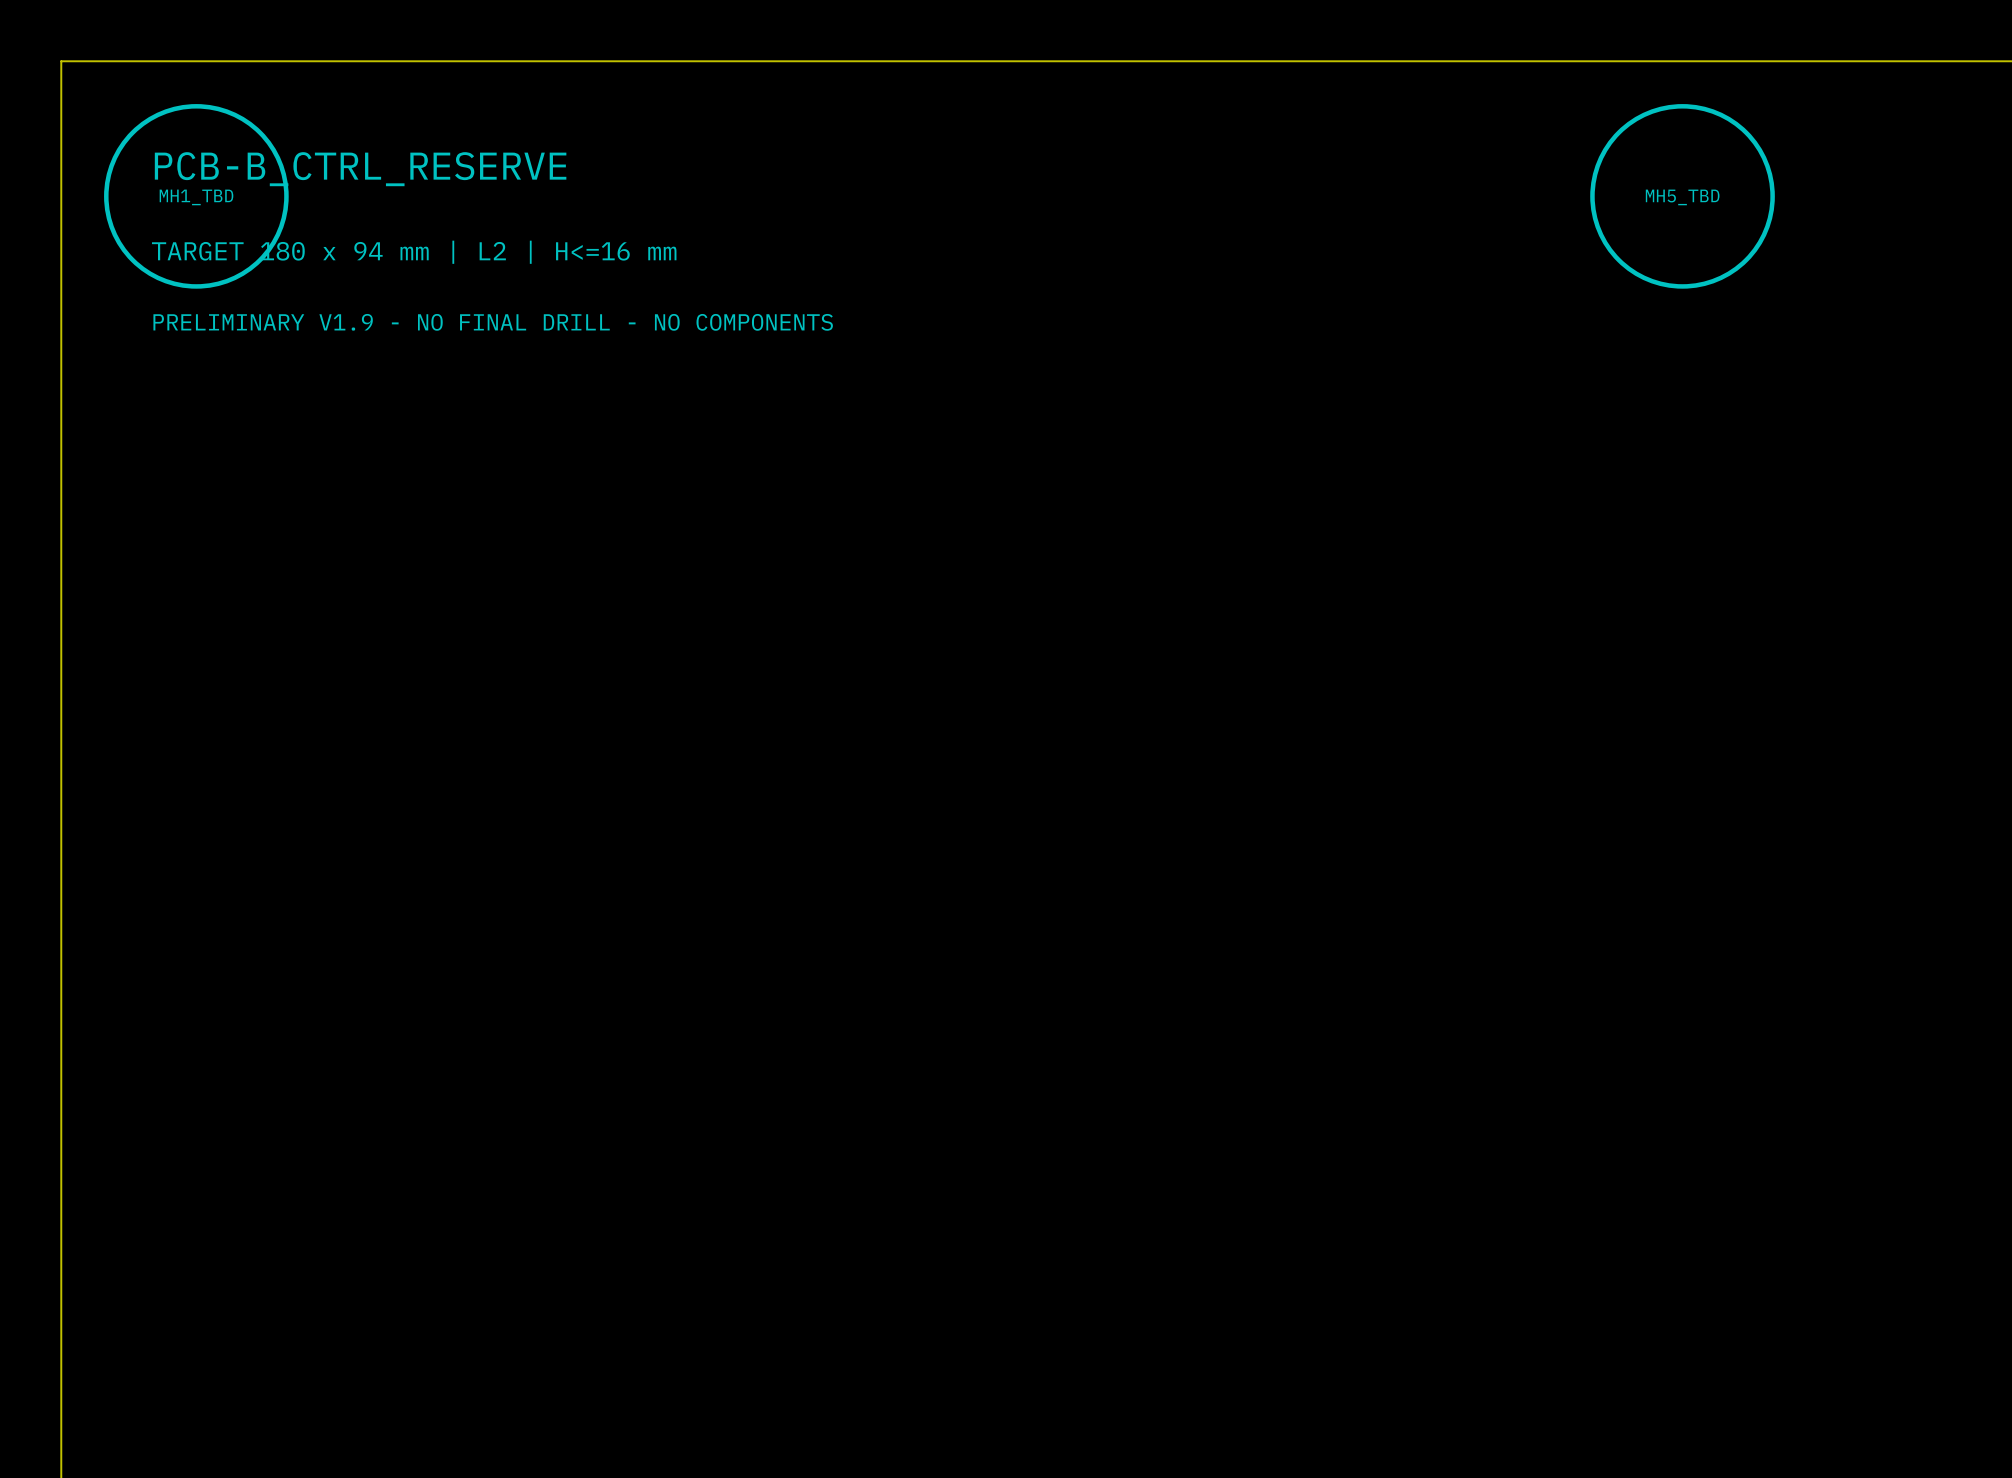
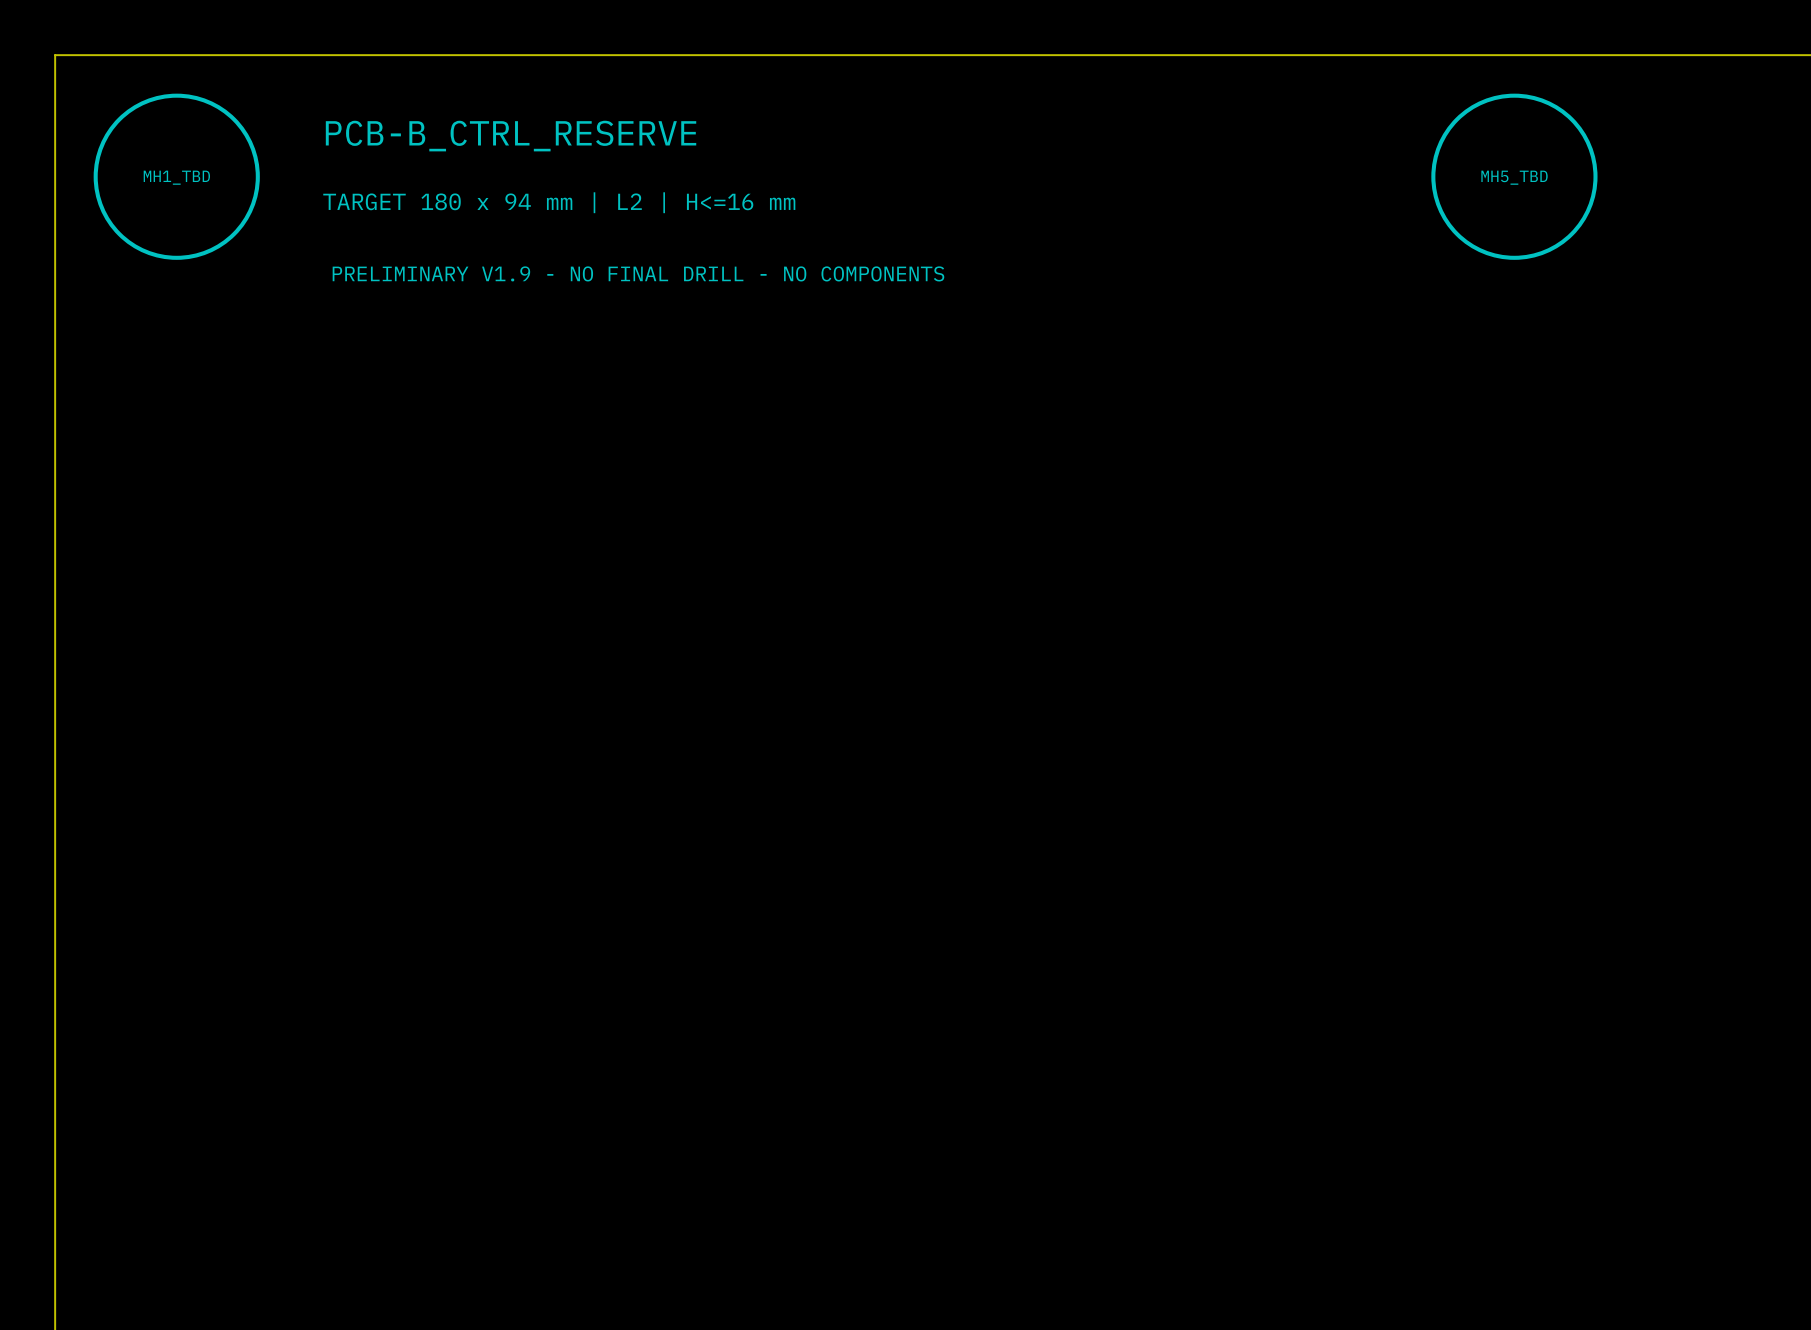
text position: PCB-B_CTRL_RESERVE (360, 169) -> PCB-B_CTRL_RESERVE (511, 136)
text position: TARGET 180 x 94 mm | L2 | H<=16 mm (414, 252) -> TARGET 180 x 94 mm | L2 | H<=16 mm (559, 202)
text position: PRELIMINARY V1.9 - NO FINAL DRILL - NO COMPONENTS (493, 322) -> PRELIMINARY V1.9 - NO FINAL DRILL - NO COMPONENTS (638, 273)

